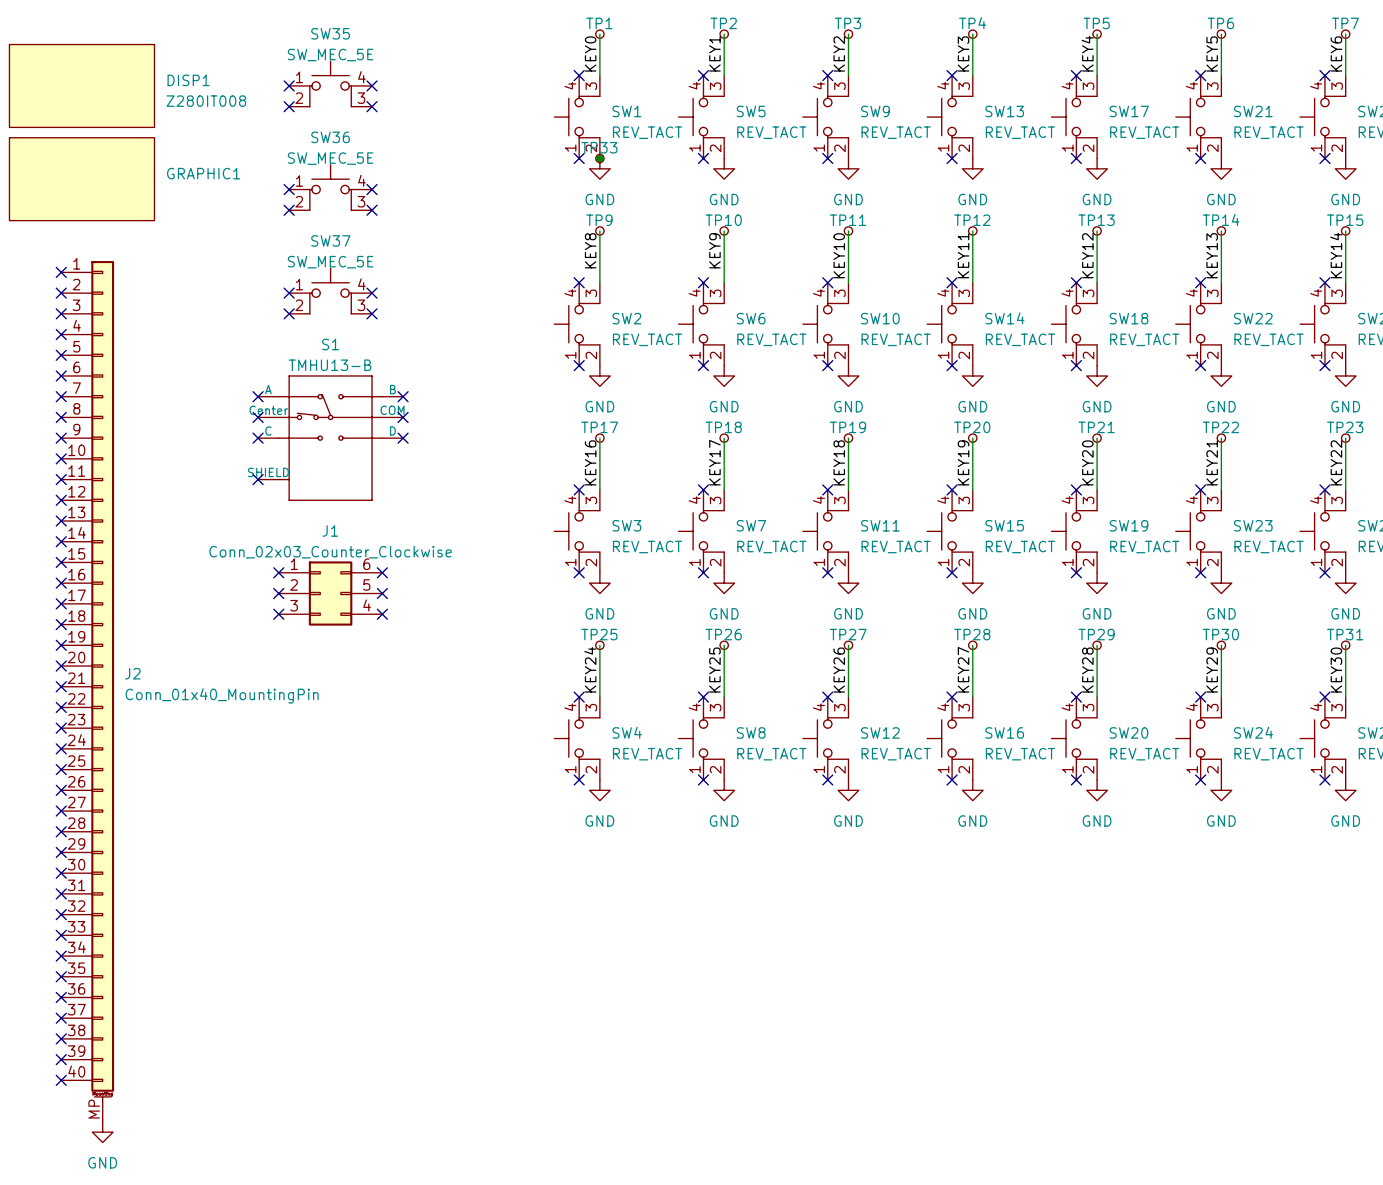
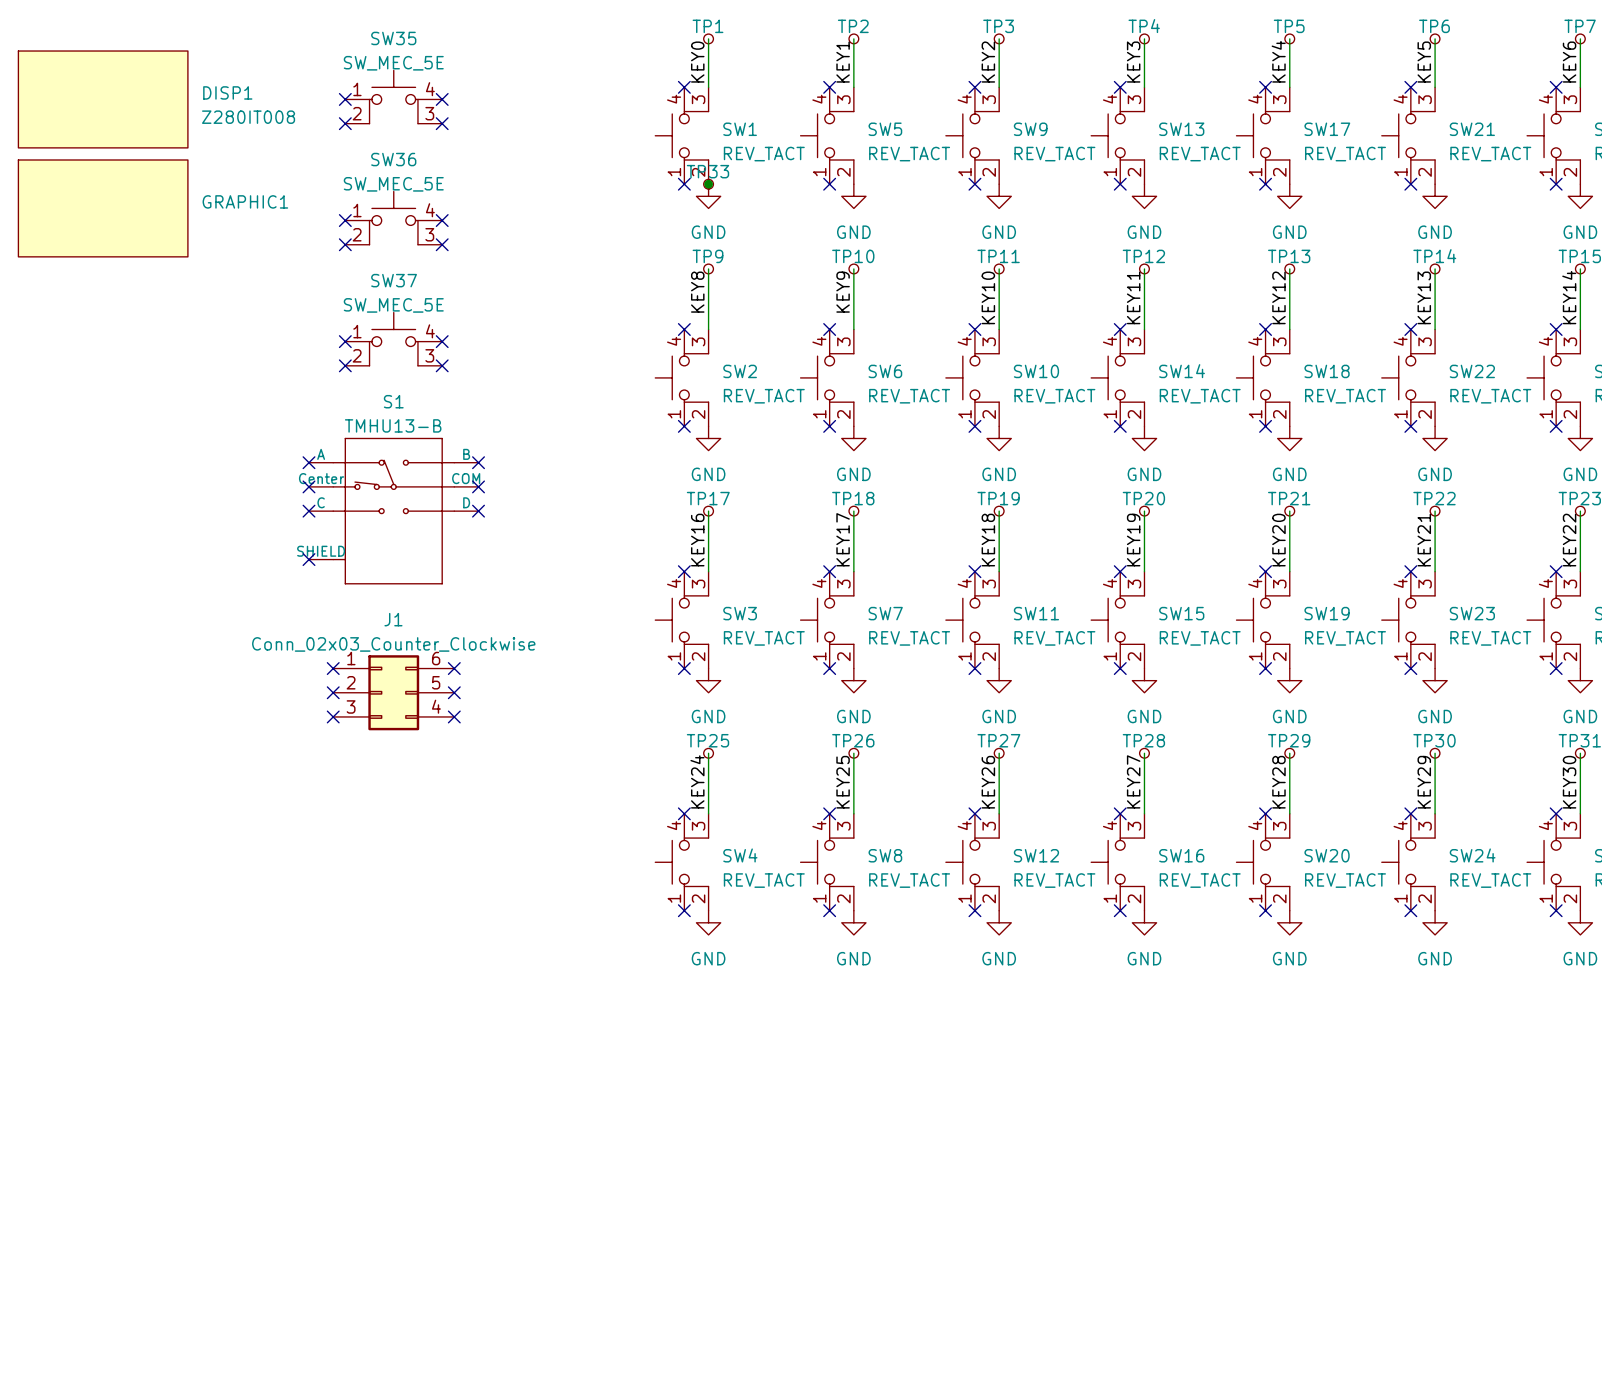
no-connect mark: (61, 272) -> none
no-connect mark: (61, 293) -> none
no-connect mark: (61, 313) -> none
no-connect mark: (61, 334) -> none
no-connect mark: (61, 355) -> none
no-connect mark: (61, 375) -> none
no-connect mark: (61, 396) -> none
no-connect mark: (61, 417) -> none
no-connect mark: (61, 438) -> none
no-connect mark: (61, 458) -> none
no-connect mark: (61, 479) -> none
no-connect mark: (61, 500) -> none
no-connect mark: (61, 521) -> none
no-connect mark: (61, 541) -> none
no-connect mark: (61, 562) -> none
no-connect mark: (61, 583) -> none
no-connect mark: (61, 603) -> none
no-connect mark: (61, 624) -> none
no-connect mark: (61, 645) -> none
no-connect mark: (61, 666) -> none
no-connect mark: (61, 686) -> none
J2: Conn_01x40_MountingPin (87, 691) -> none
no-connect mark: (61, 707) -> none
no-connect mark: (61, 728) -> none
no-connect mark: (61, 748) -> none
no-connect mark: (61, 769) -> none
no-connect mark: (61, 790) -> none
no-connect mark: (61, 811) -> none
no-connect mark: (61, 831) -> none
no-connect mark: (61, 852) -> none
no-connect mark: (61, 873) -> none
no-connect mark: (61, 893) -> none
no-connect mark: (61, 914) -> none
no-connect mark: (61, 935) -> none
no-connect mark: (61, 956) -> none
no-connect mark: (61, 976) -> none
no-connect mark: (61, 997) -> none
no-connect mark: (61, 1018) -> none
no-connect mark: (61, 1038) -> none
no-connect mark: (61, 1059) -> none
no-connect mark: (61, 1080) -> none
power symbol: GND (102, 1132) -> none

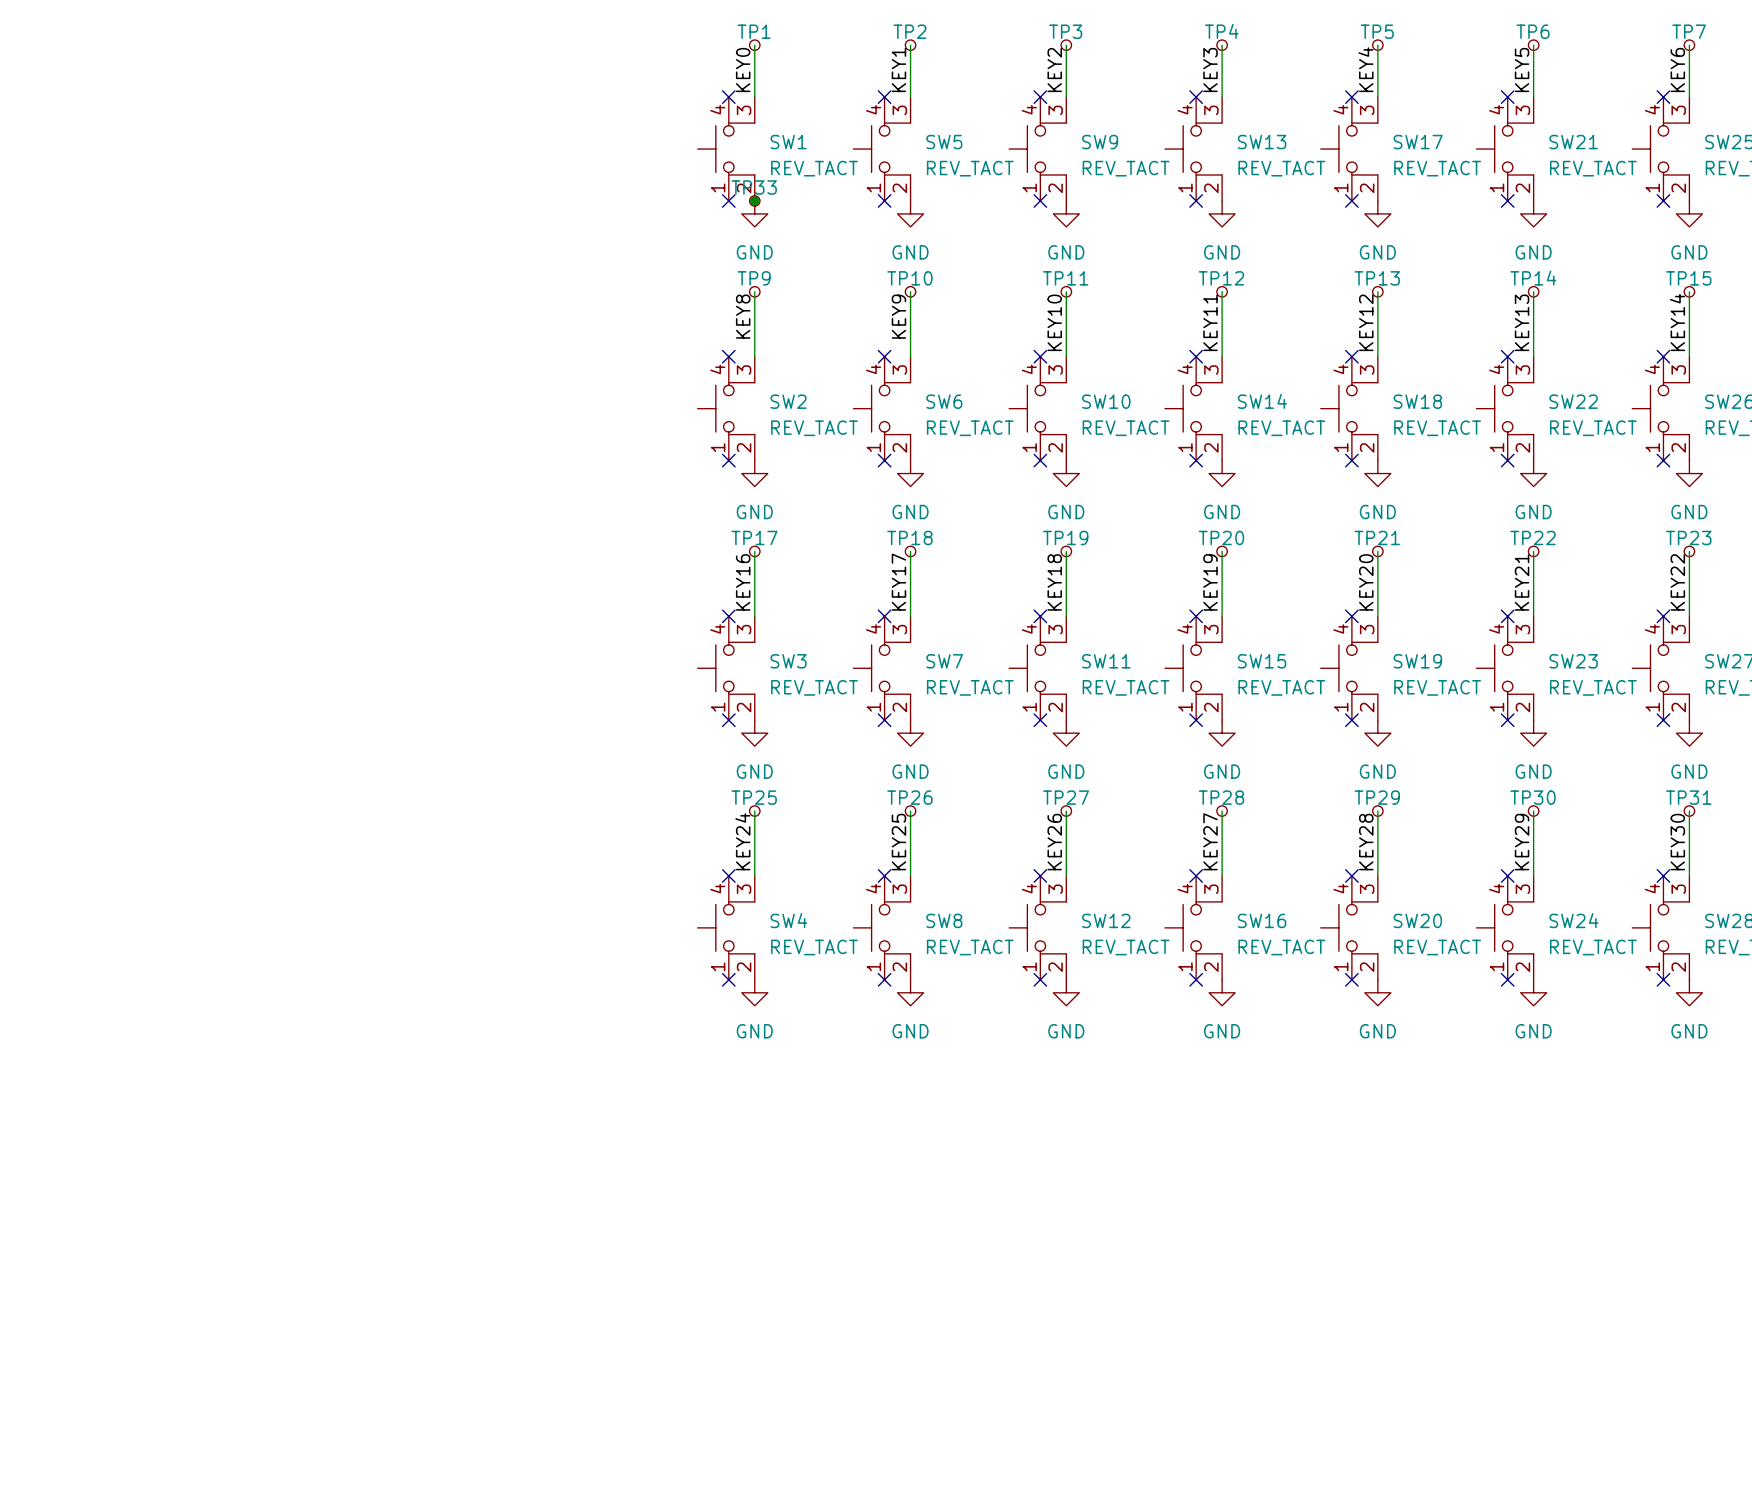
SW35: SW_MEC_5E (393, 97) -> none
DISP1: Z280IT008 (103, 99) -> none
no-connect mark: (345, 99) -> none
no-connect mark: (442, 99) -> none
no-connect mark: (345, 123) -> none
no-connect mark: (442, 123) -> none
GRAPHIC1: (103, 208) -> none
SW36: SW_MEC_5E (393, 218) -> none
no-connect mark: (345, 220) -> none
no-connect mark: (442, 220) -> none
no-connect mark: (345, 244) -> none
no-connect mark: (442, 244) -> none
SW37: SW_MEC_5E (393, 339) -> none
no-connect mark: (345, 341) -> none
no-connect mark: (442, 341) -> none
no-connect mark: (345, 365) -> none
no-connect mark: (442, 365) -> none
no-connect mark: (309, 462) -> none
no-connect mark: (478, 462) -> none
no-connect mark: (309, 486) -> none
no-connect mark: (478, 486) -> none
no-connect mark: (309, 511) -> none
S1: TMHU13-B (393, 511) -> none
no-connect mark: (478, 511) -> none
no-connect mark: (309, 559) -> none
no-connect mark: (333, 668) -> none
no-connect mark: (454, 668) -> none
no-connect mark: (333, 692) -> none
J1: Conn_02x03_Counter_Clockwise (393, 692) -> none
no-connect mark: (454, 692) -> none
no-connect mark: (333, 716) -> none
no-connect mark: (454, 716) -> none

